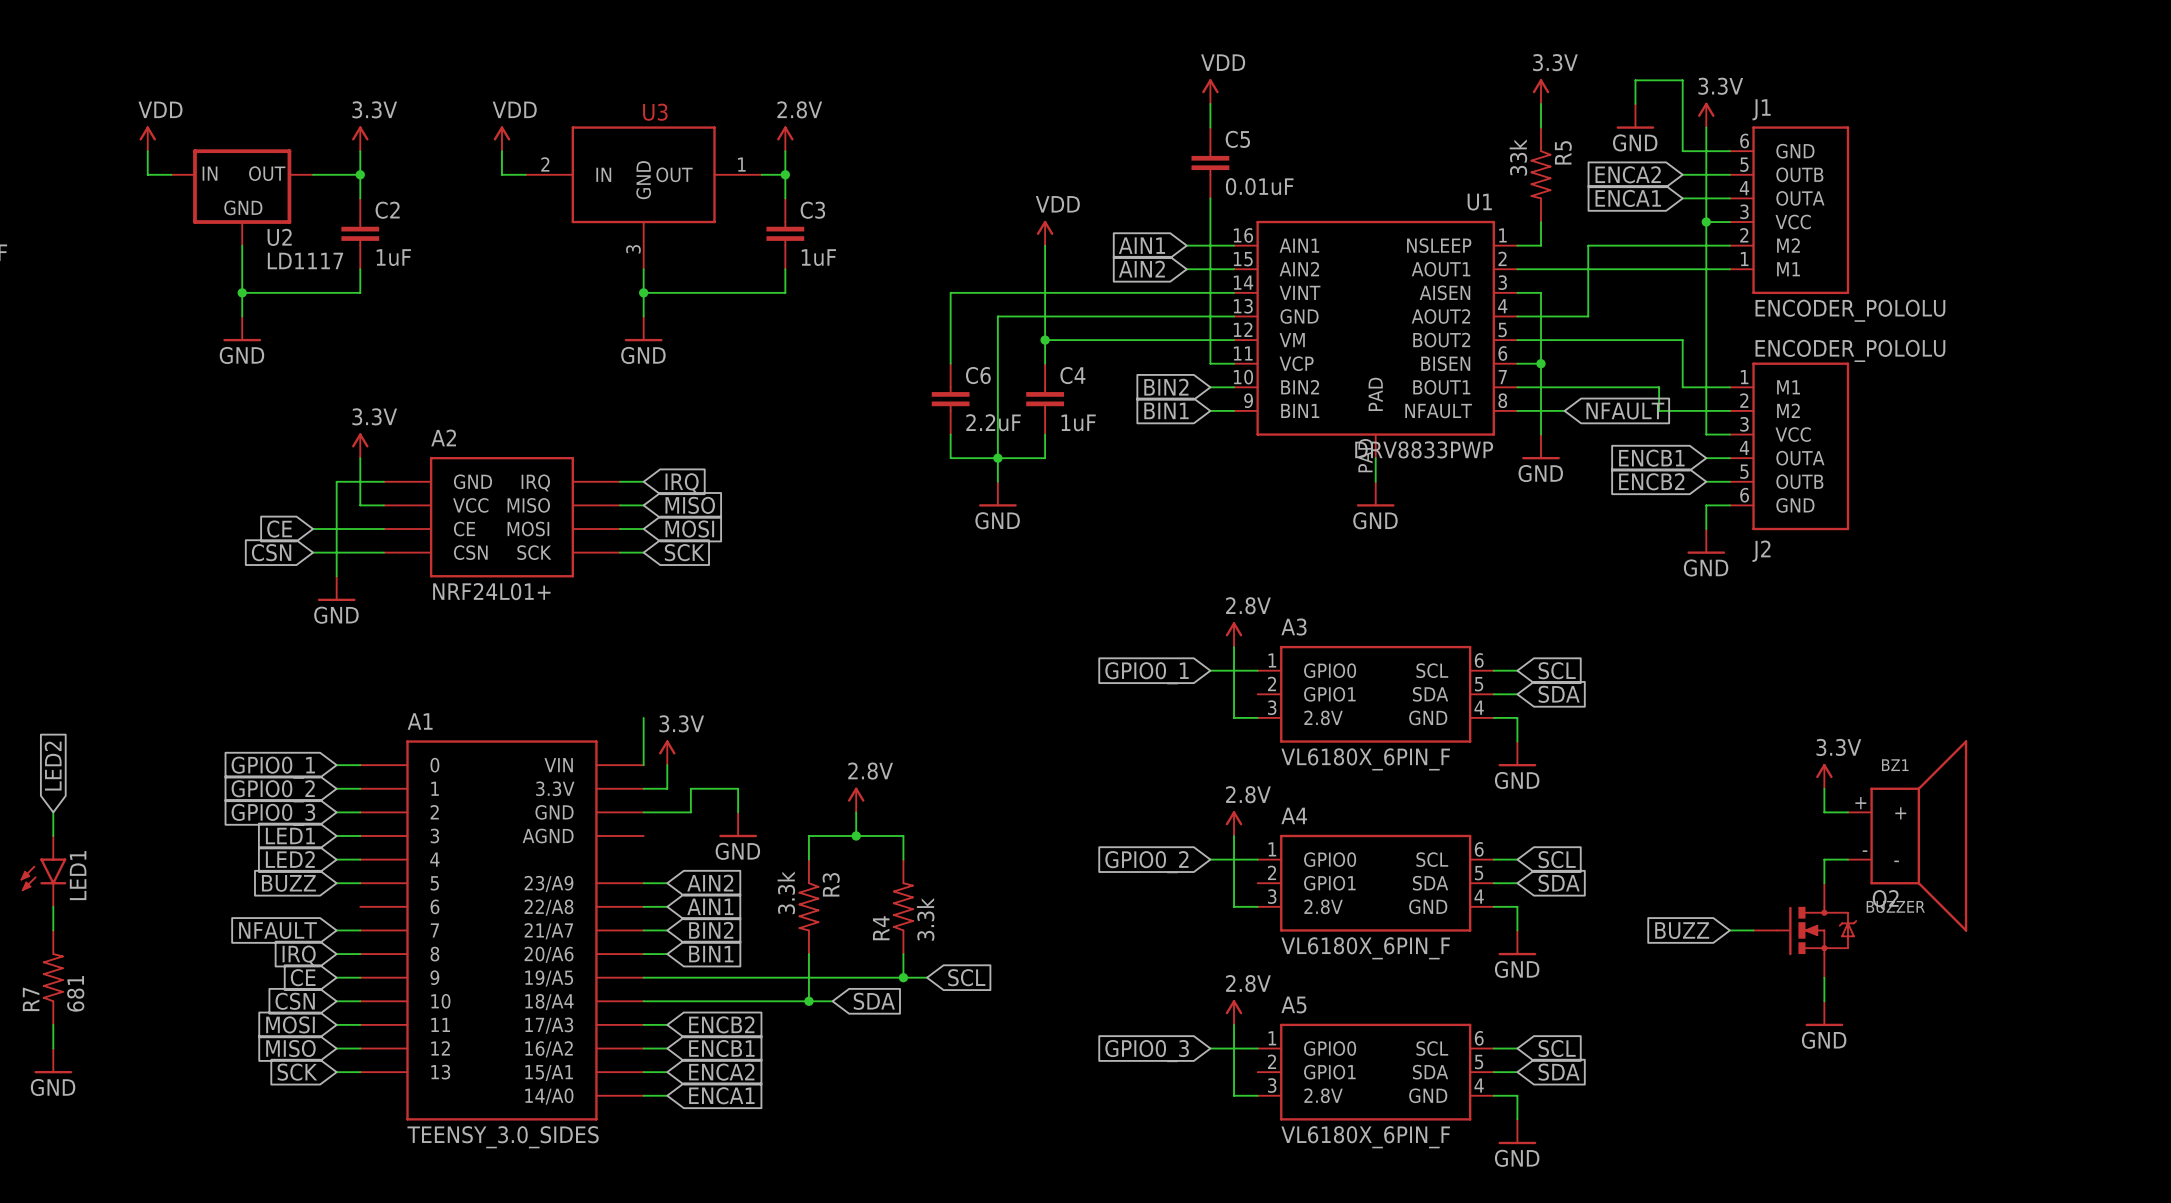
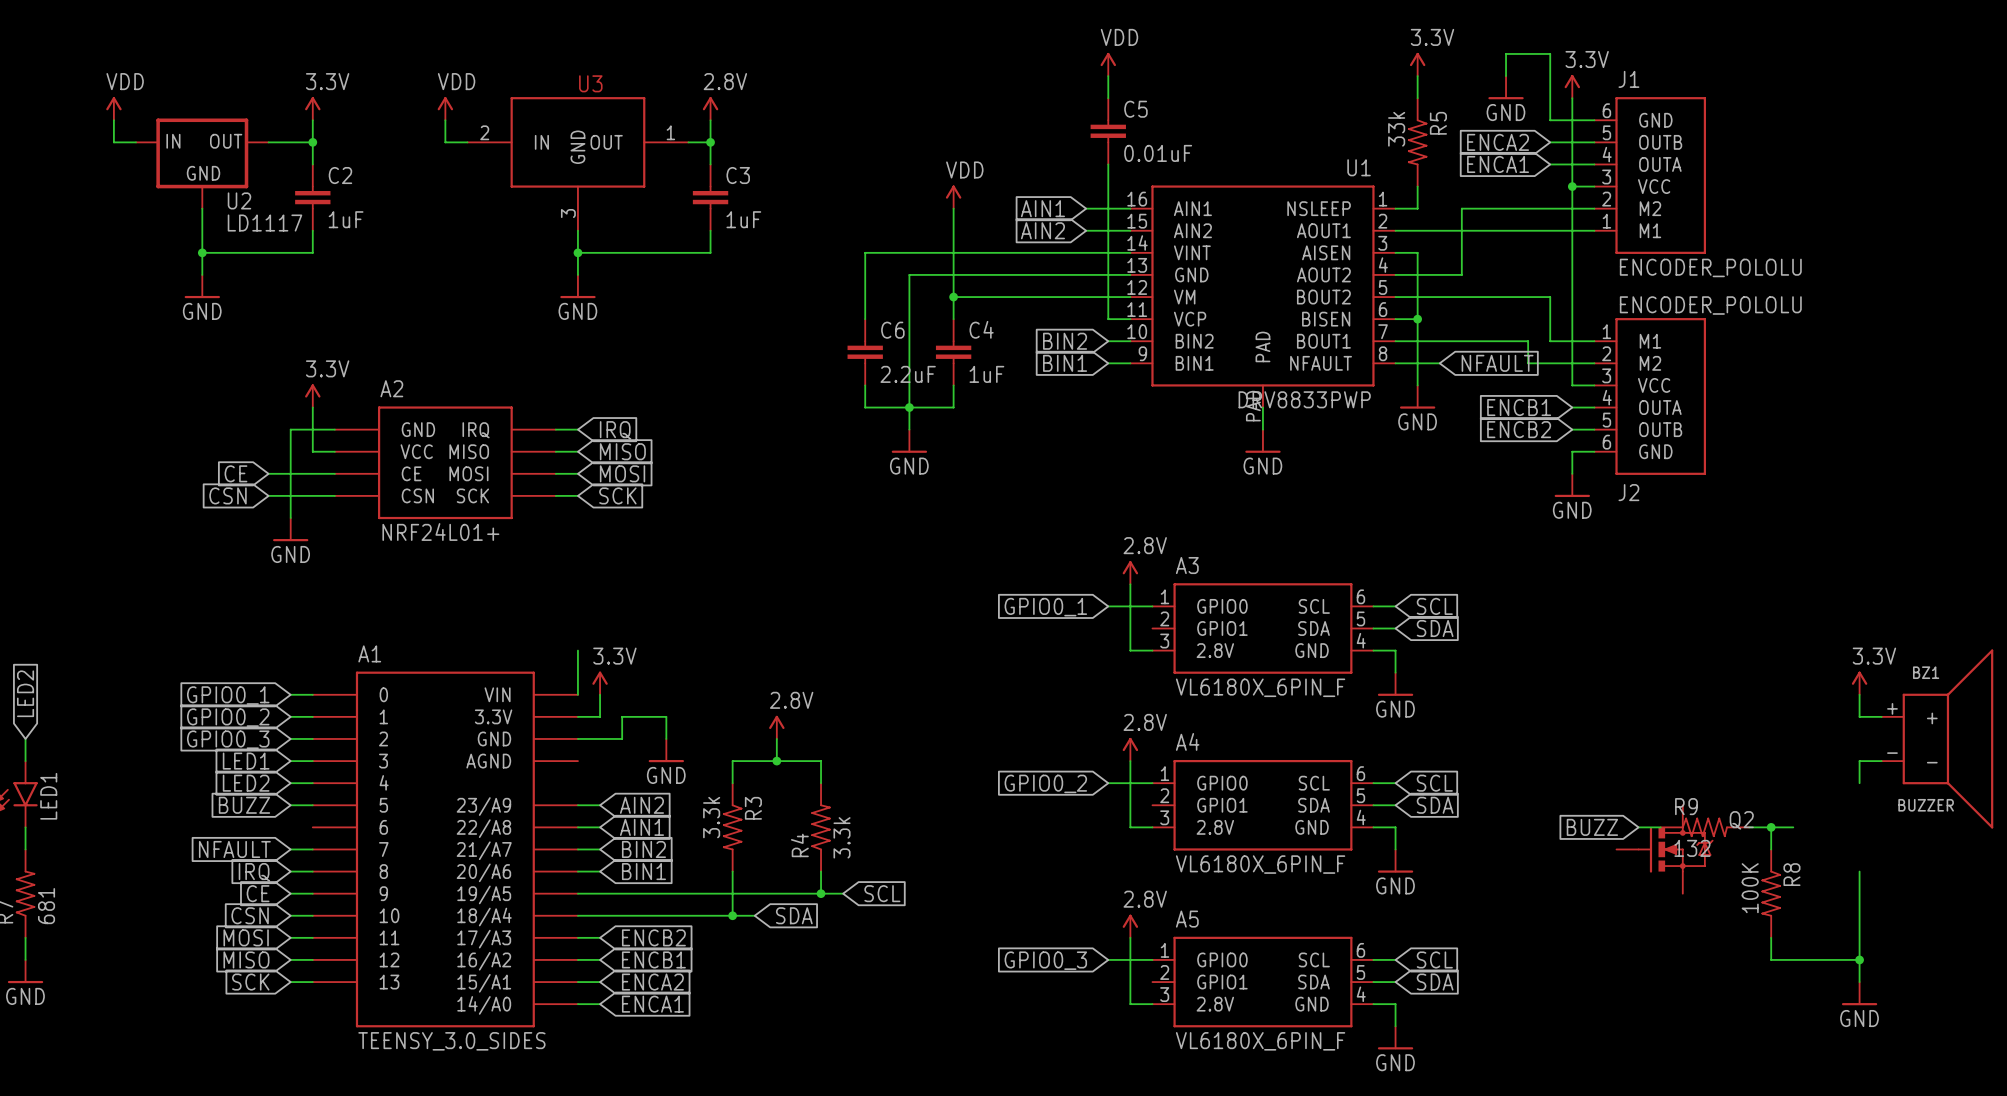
power symbol position: 3.3V (1824, 776) -> 3.3V (1859, 683)
wire: (1824, 788) (1824, 812) (1847, 812) -> (1859, 694) (1859, 716) (1881, 716)
BZ1 position: (1907, 836) -> (1937, 738)
wire: (1847, 859) (1824, 859) (1824, 883) -> (1881, 761) (1859, 761) (1859, 783)
R9: none -> 132 (1704, 827)
wire: none -> (1749, 827) (1793, 827)
junction: none -> (1771, 827)
global label position: BUZZ (1682, 930) -> BUZZ (1592, 827)
wire: (1729, 930) (1753, 930) -> (1638, 827) (1660, 827)
wire: none -> (1859, 871) (1859, 982)
wire: (1824, 977) (1824, 1001) -> (1771, 827) (1771, 849)
R8: none -> 100K (1771, 893)
power symbol position: GND (1824, 1013) -> GND (1859, 993)
wire: none -> (1771, 937) (1771, 959) (1859, 959)
junction: none -> (1859, 959)

